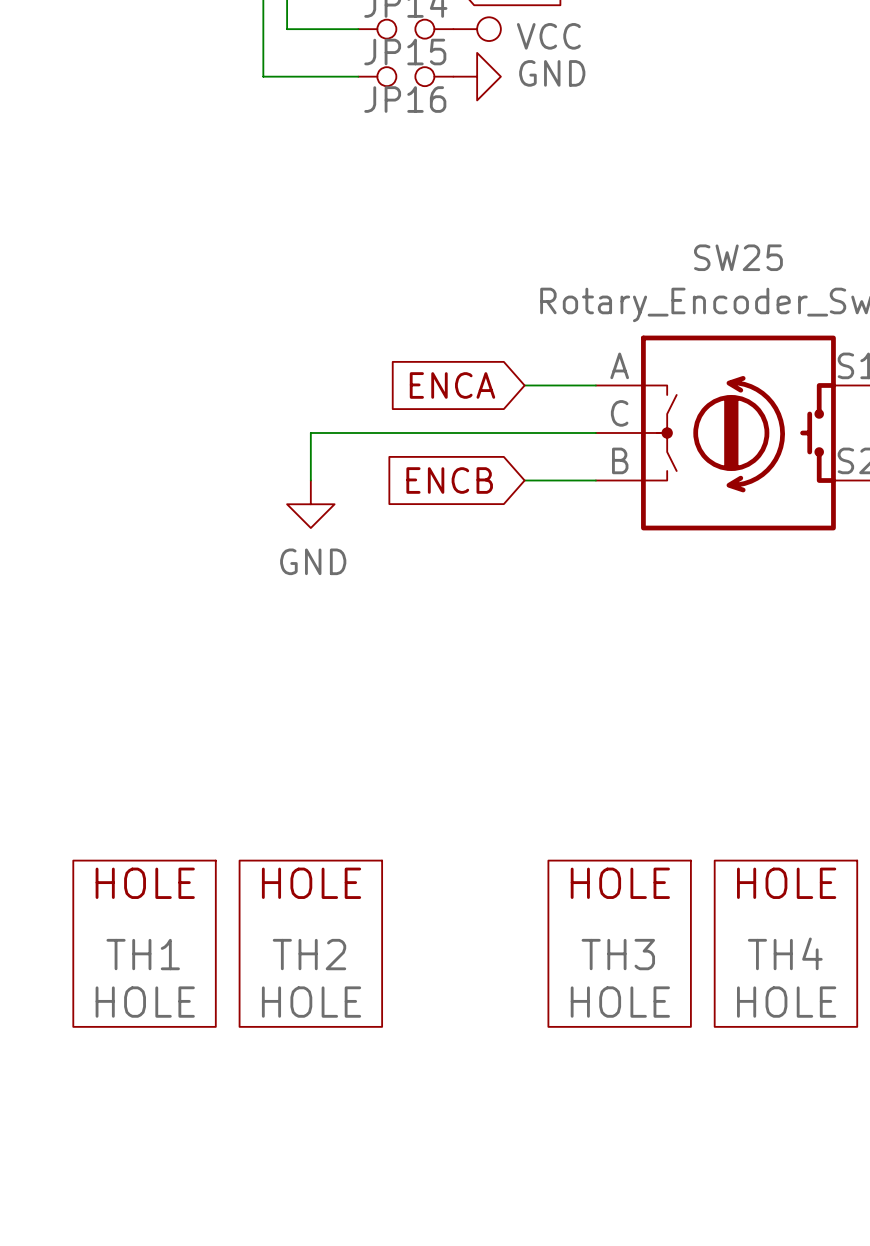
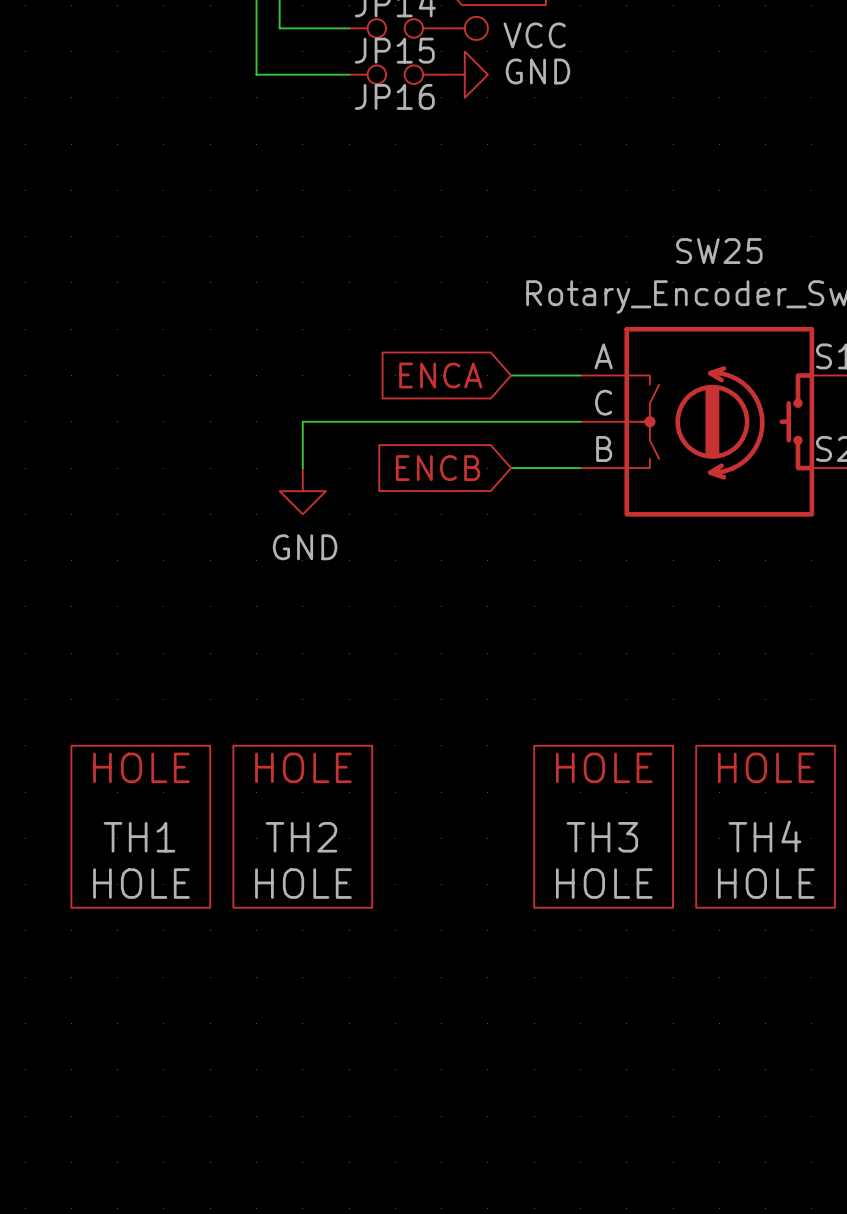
TH1 position: (144, 943) -> (140, 826)
TH2 position: (310, 943) -> (302, 826)
TH3 position: (619, 943) -> (603, 826)
TH4 position: (785, 943) -> (765, 826)

